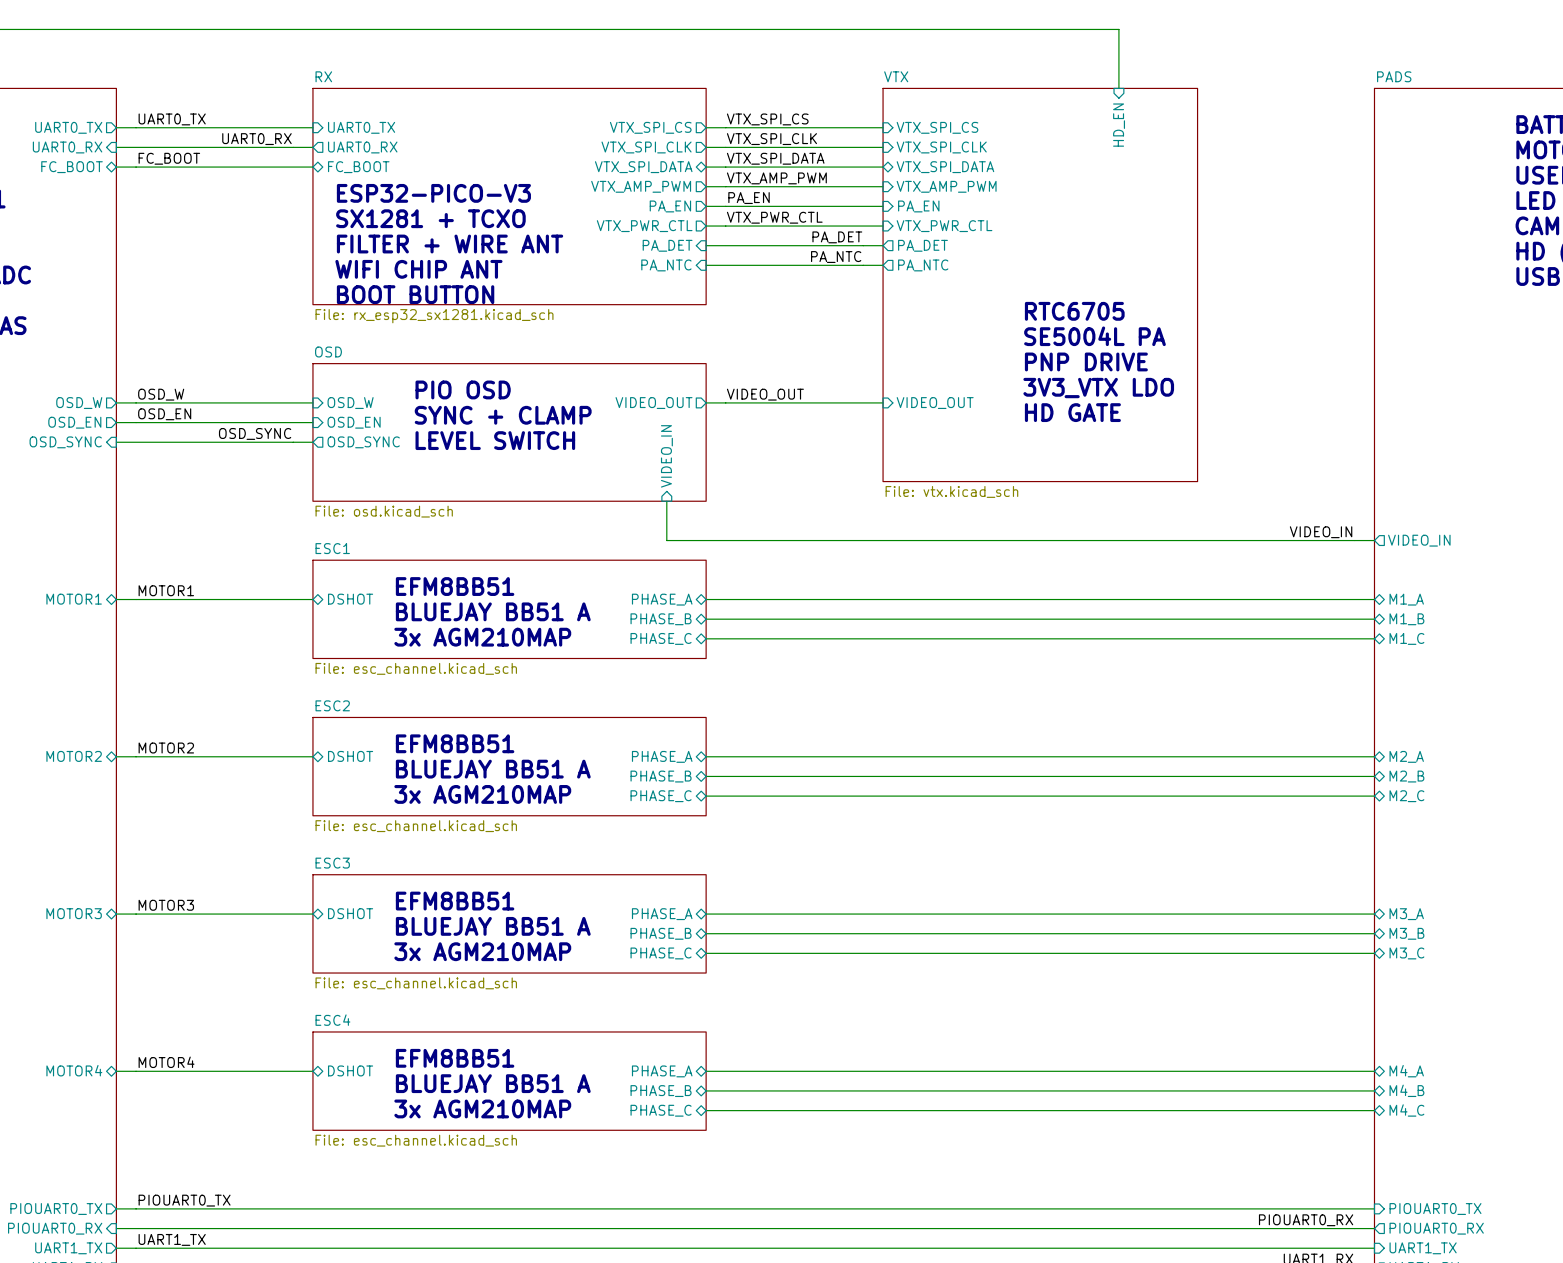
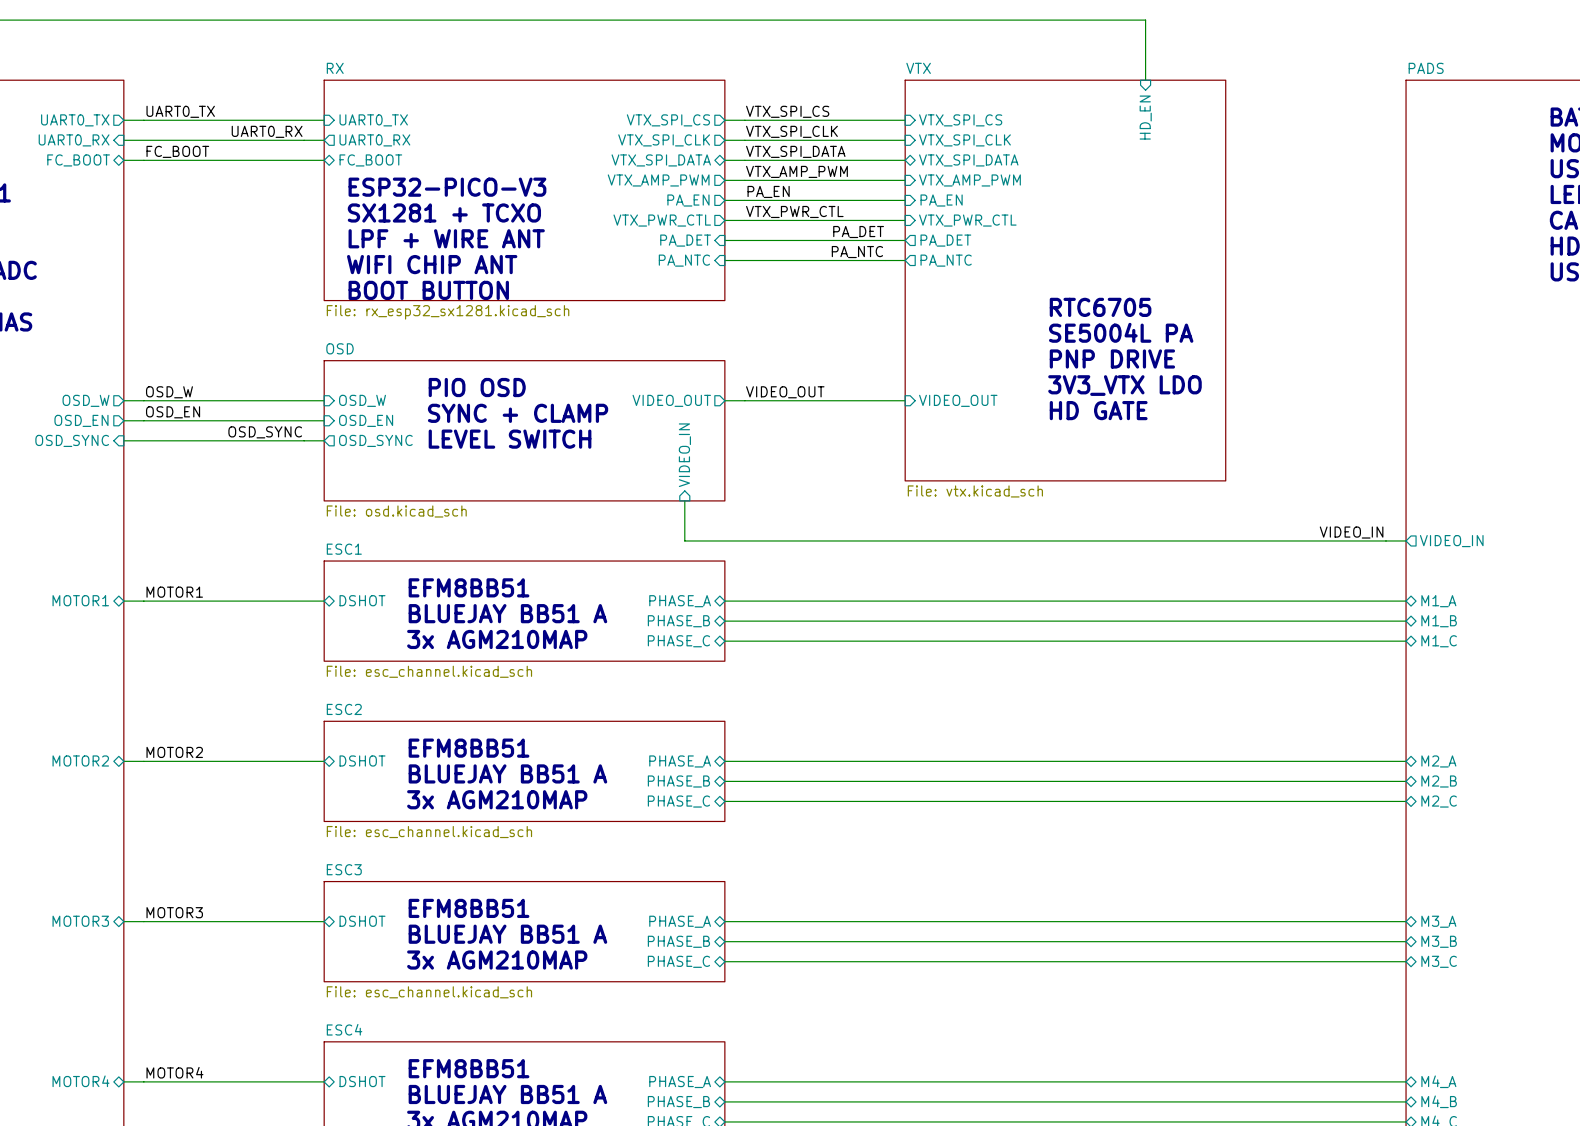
text: FILTER + WIRE ANT (450, 244) -> LPF + WIRE ANT (446, 238)

